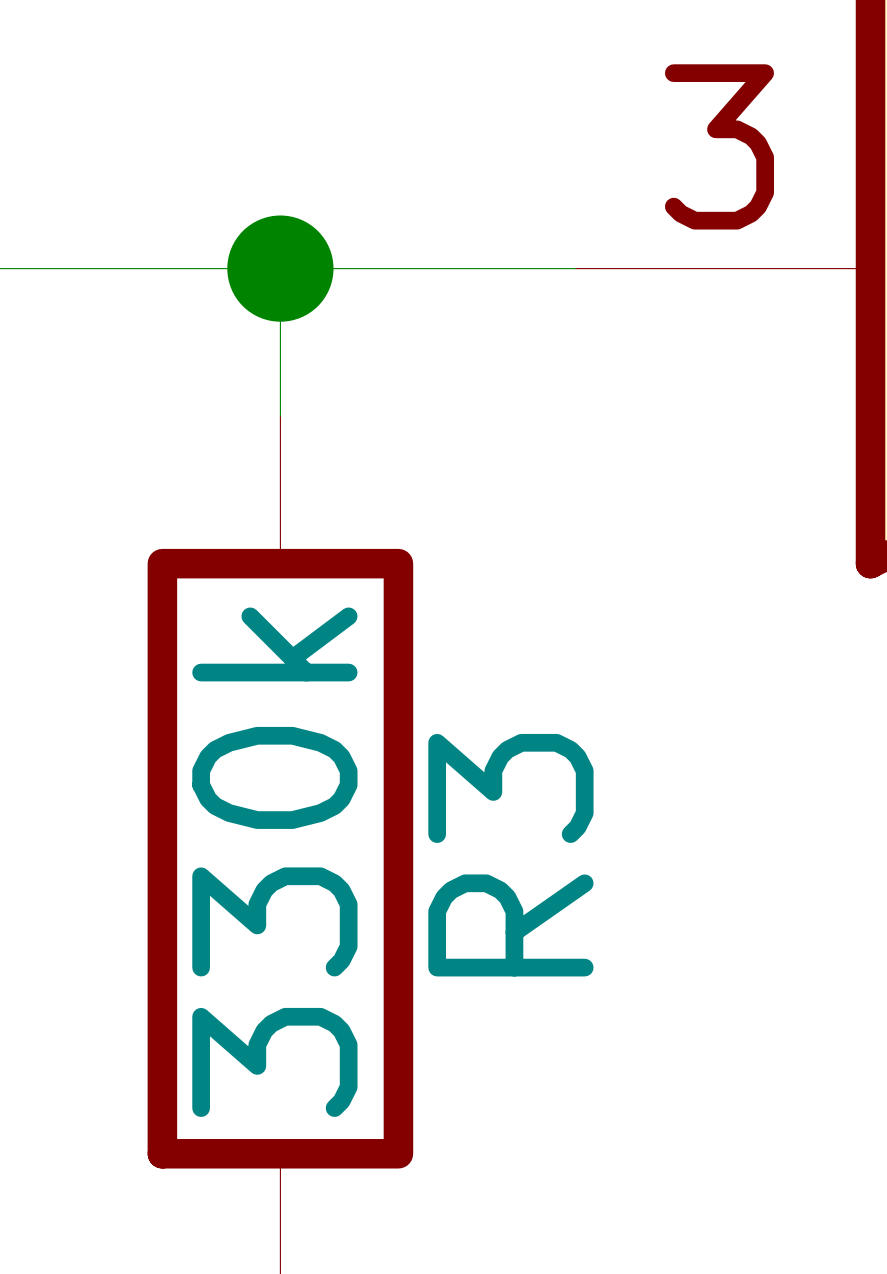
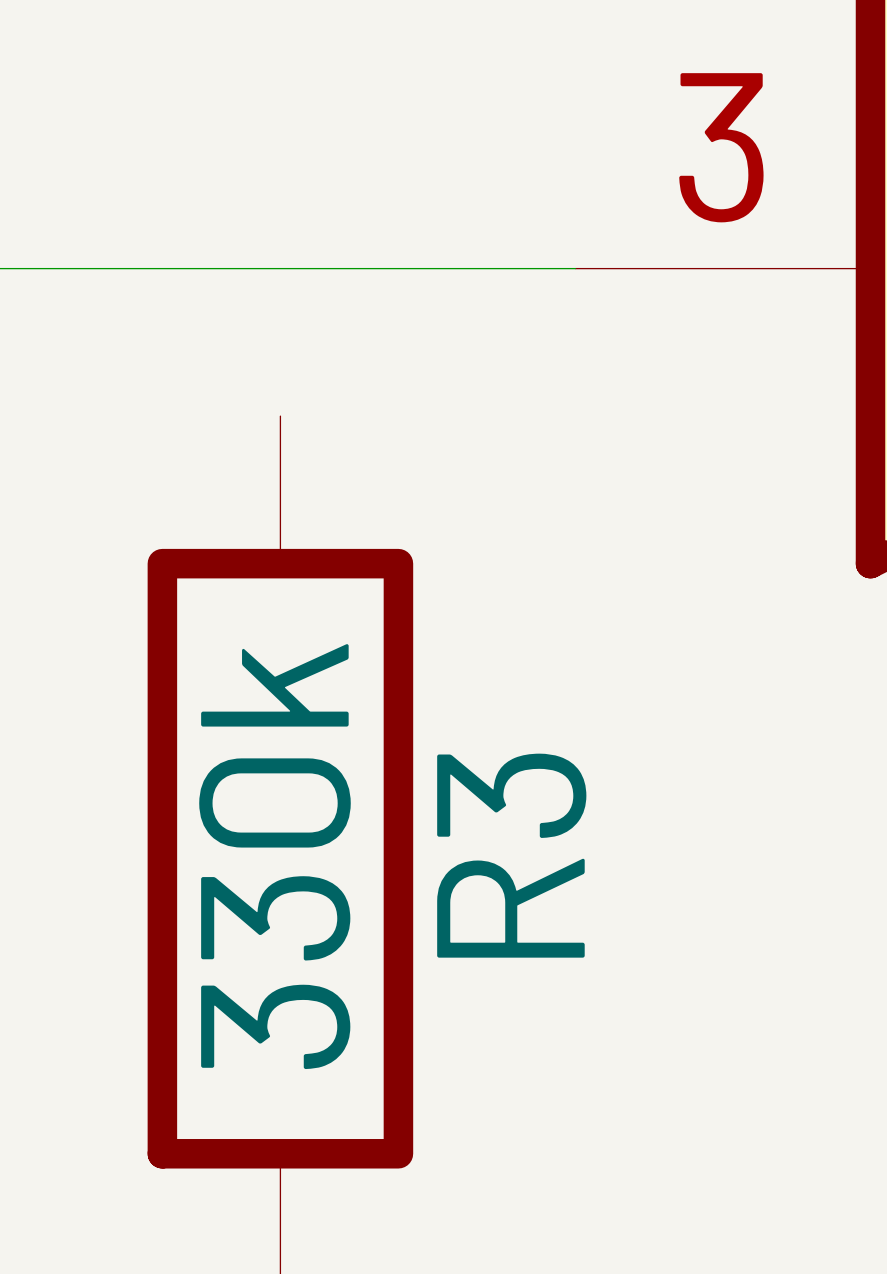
wire: (280, 268) (280, 416) -> none
junction: (280, 268) -> none

